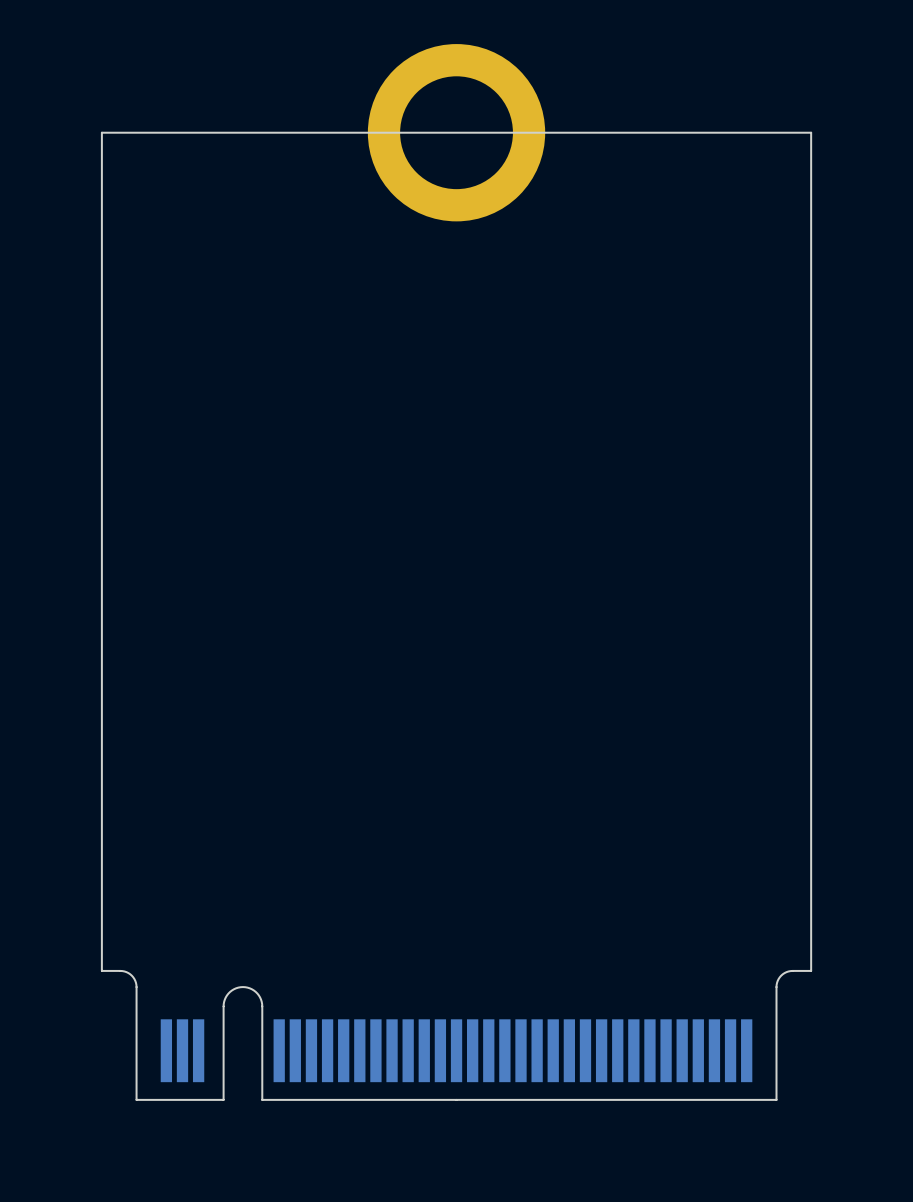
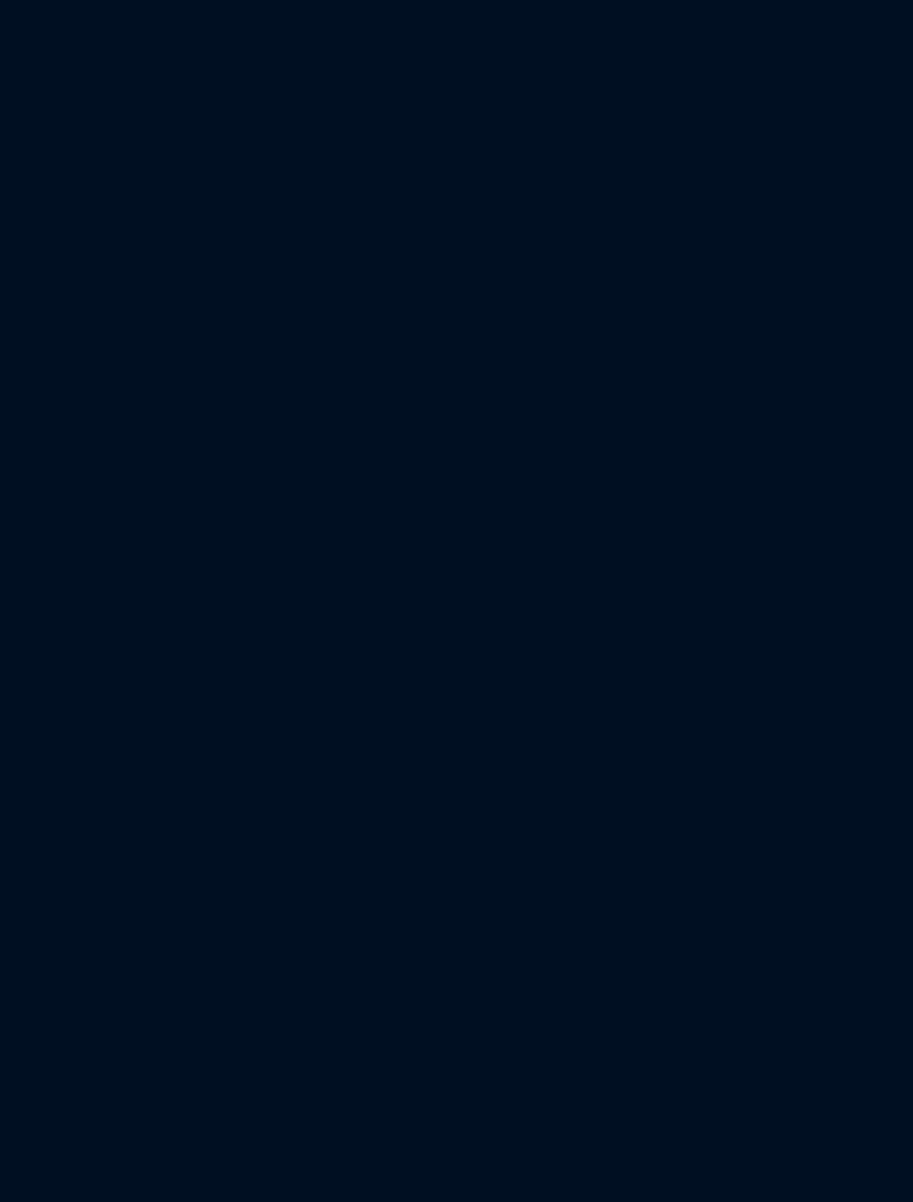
part: (456, 507) -> none
part: (456, 1035) -> none

